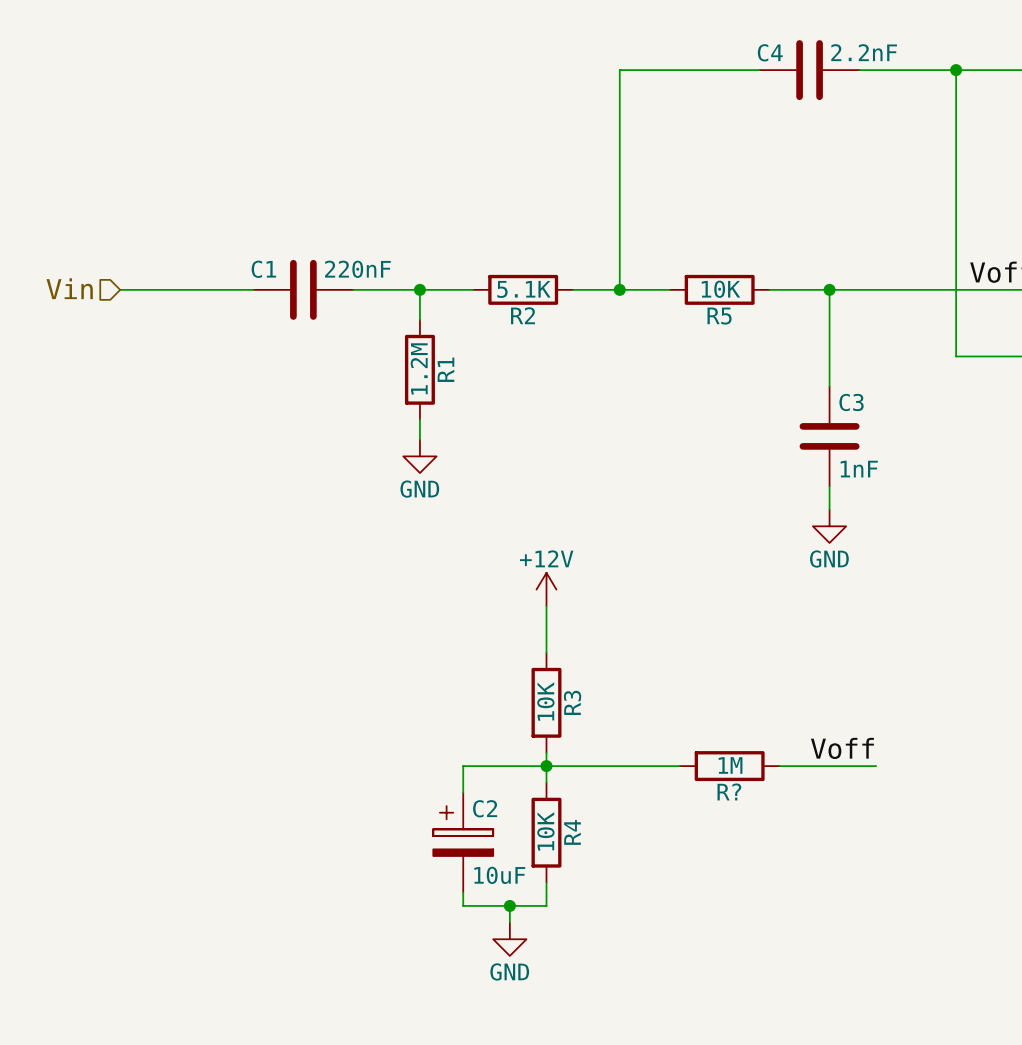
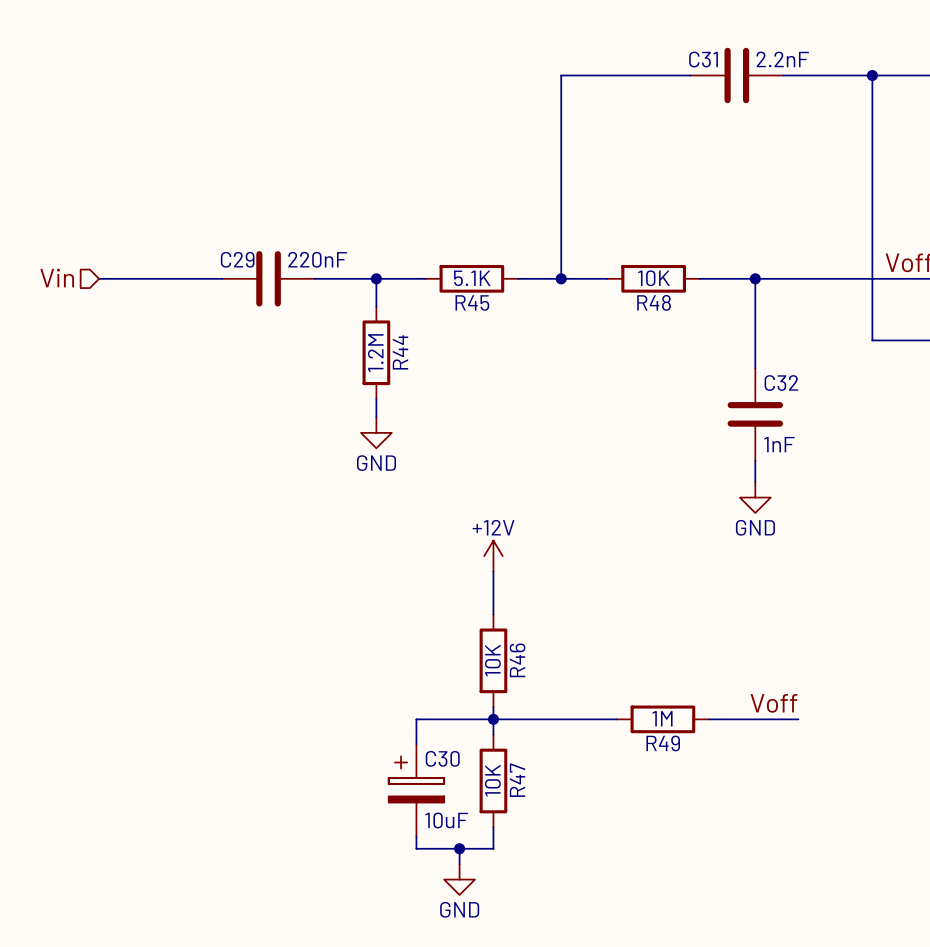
C4 name: C4 (770, 52) -> C31 (703, 59)
C1 name: C1 (263, 269) -> C29 (237, 259)
R2 name: R2 (523, 315) -> R45 (472, 302)
R5 name: R5 (719, 316) -> R48 (654, 302)
R1 name: R1 (445, 369) -> R44 (400, 352)
C3 name: C3 (851, 402) -> C32 (781, 383)
R3 name: R3 (572, 702) -> R46 (517, 660)
R? name: R? (729, 791) -> R49 (663, 743)
C2 name: C2 (485, 808) -> C30 (442, 758)
R4 name: R4 (572, 832) -> R47 (517, 780)

